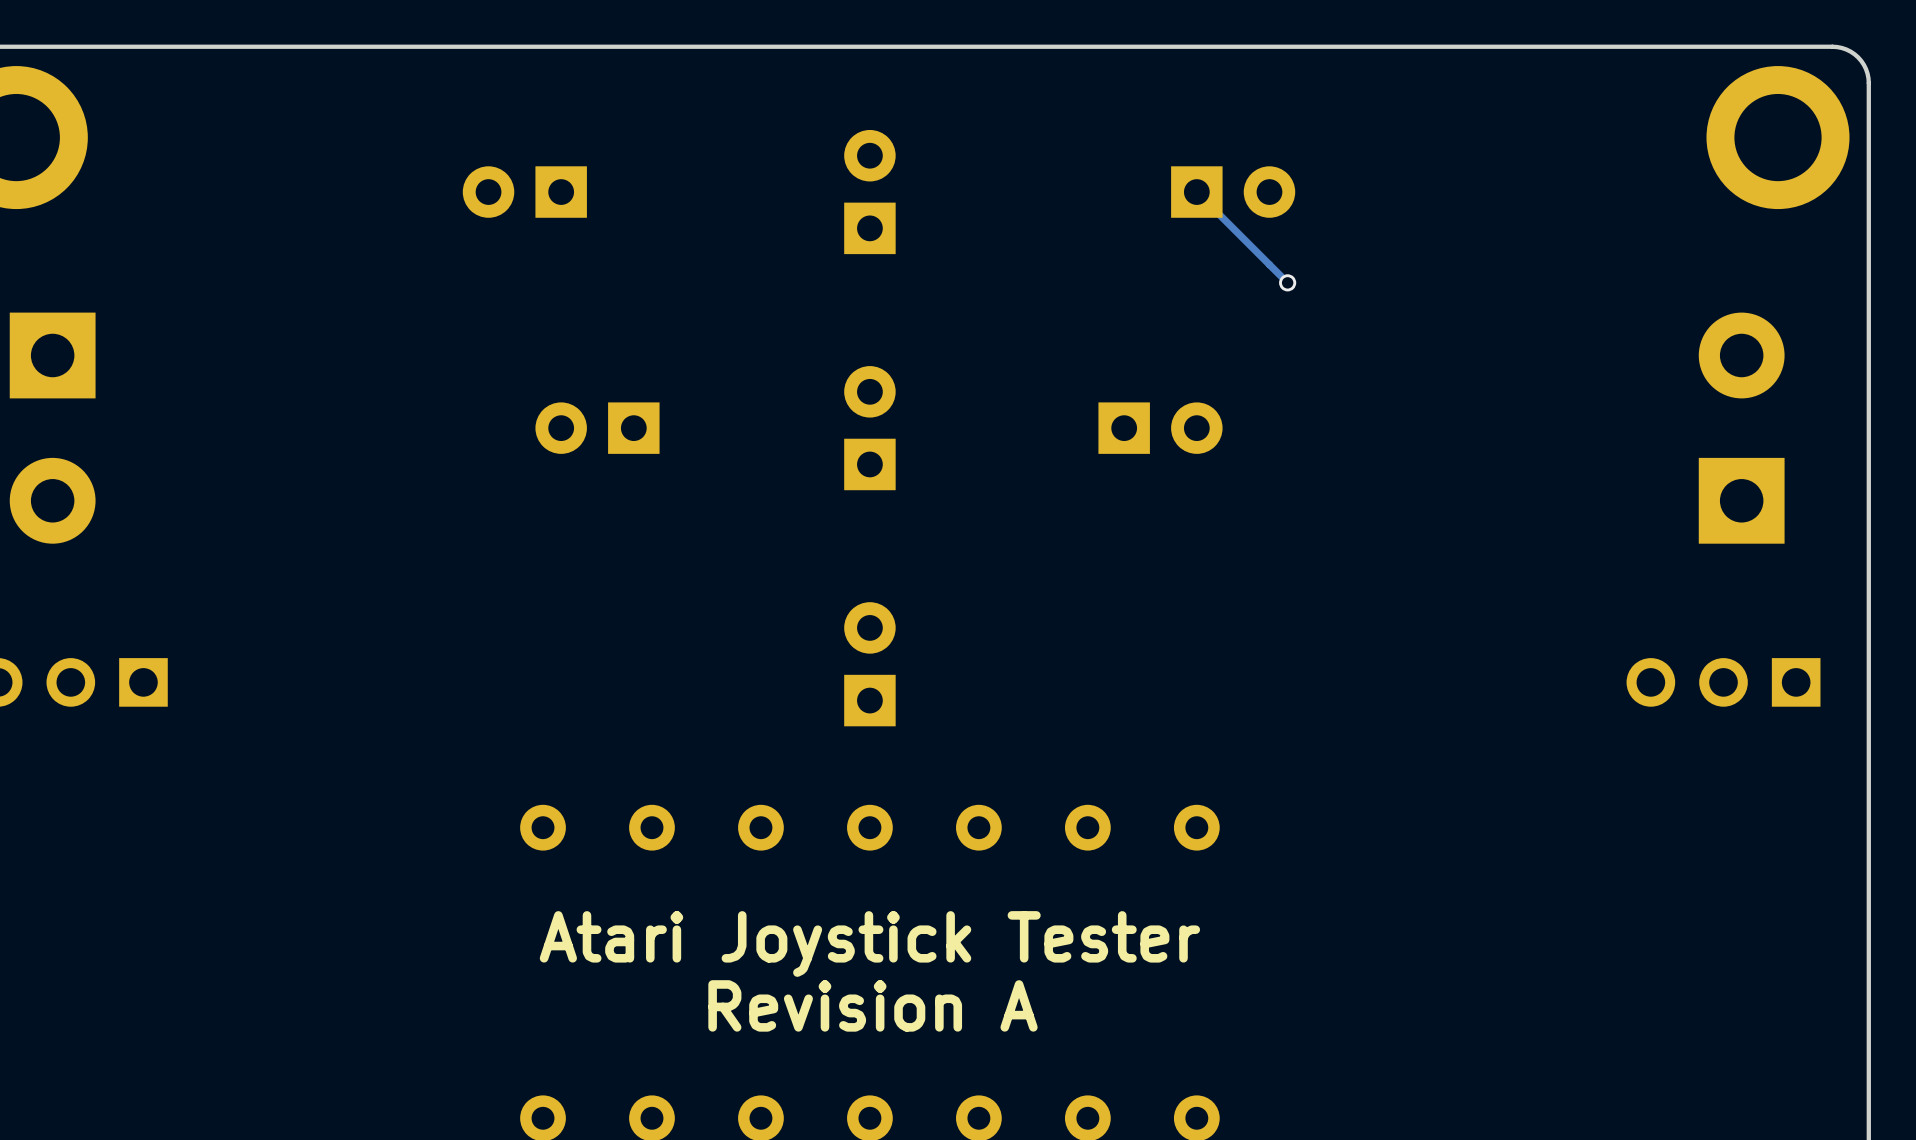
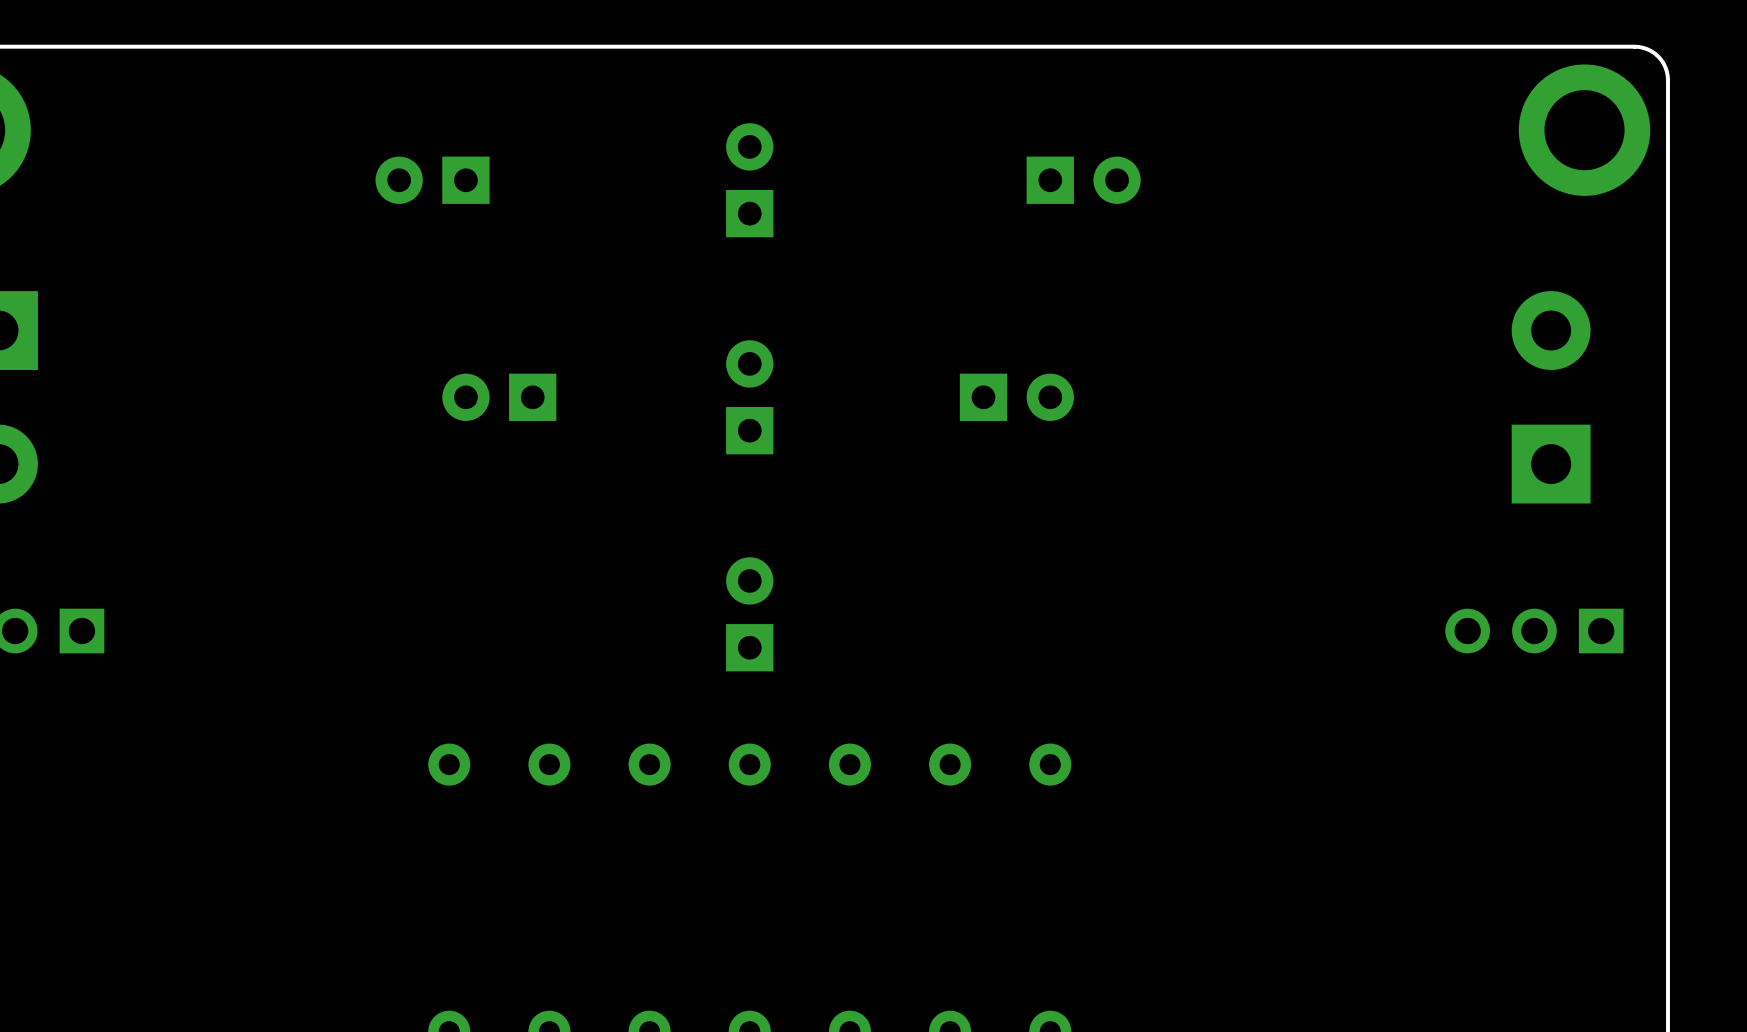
track: (1196, 192) (1287, 282) -> none
via: (1287, 282) -> none
text: Atari Joystick Tester (869, 944) -> none
text: Revision A (872, 1005) -> none

